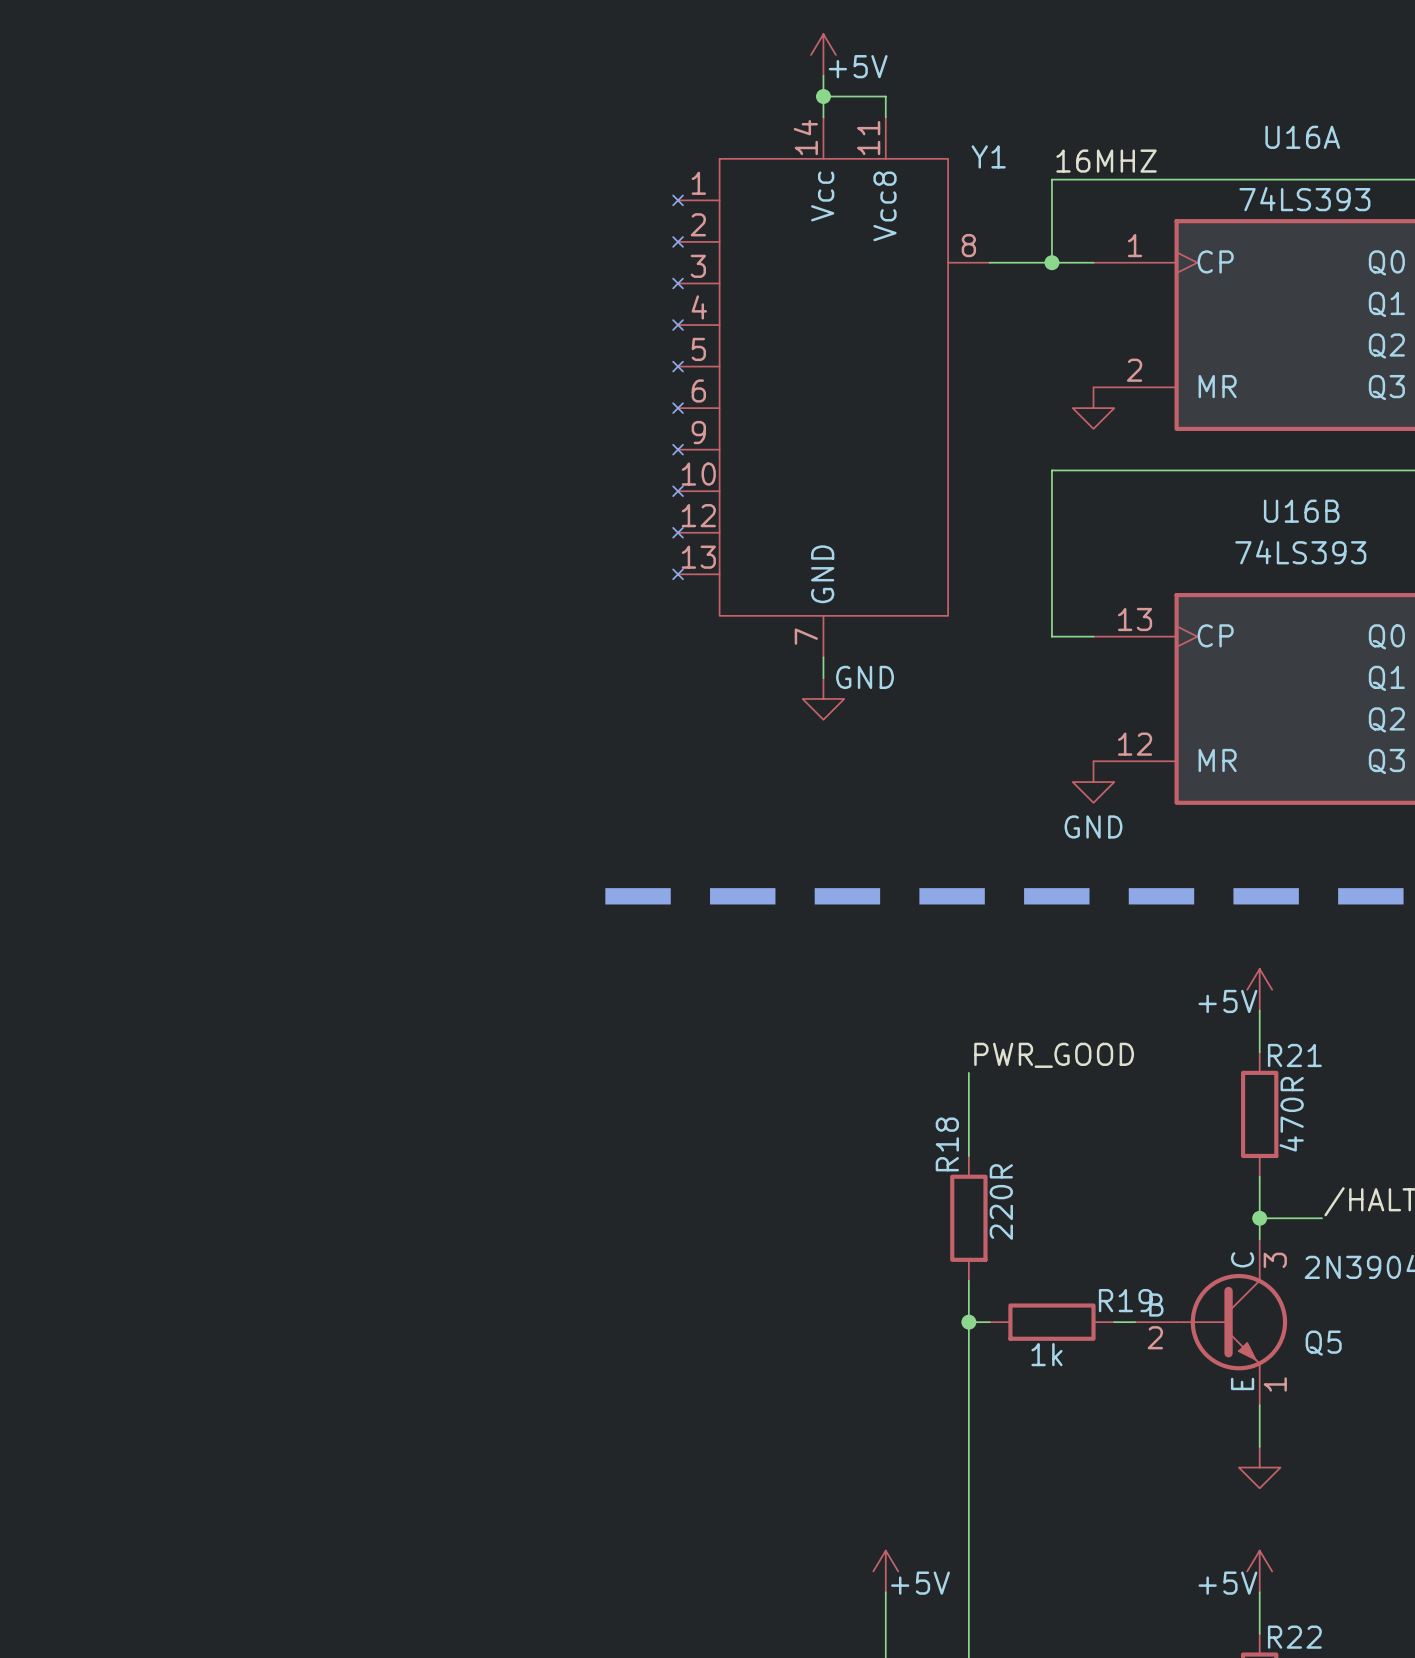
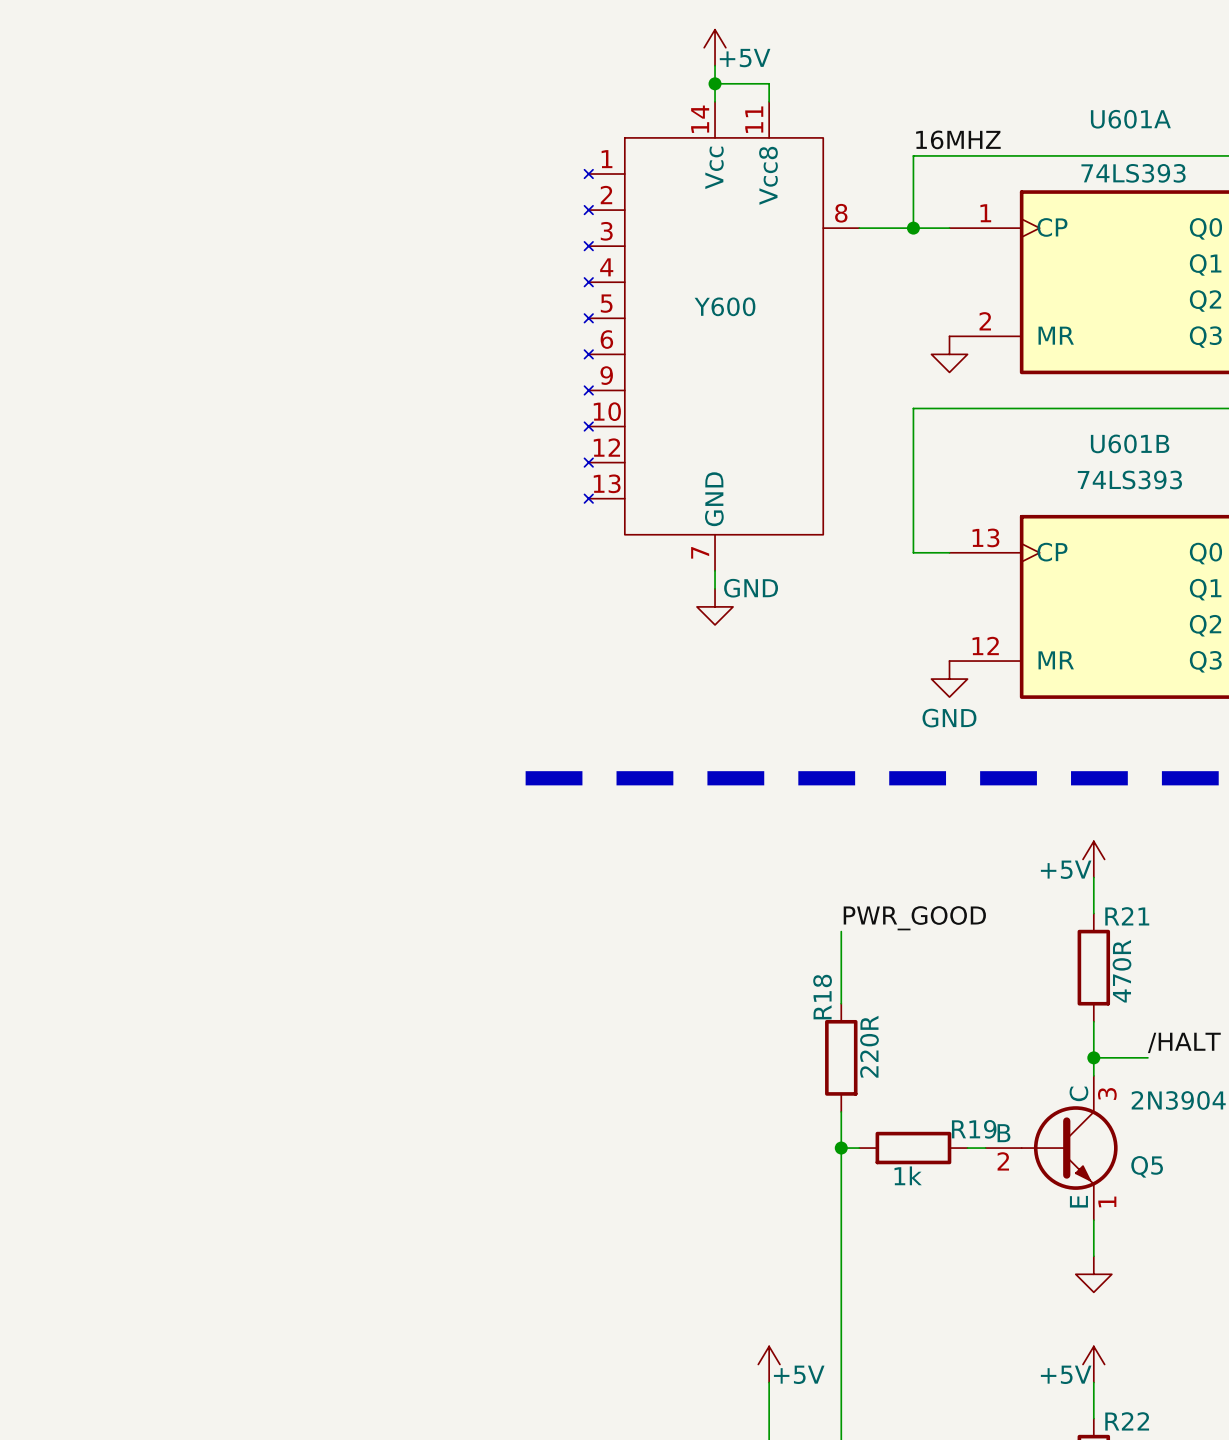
U16A name: U16A (1302, 137) -> U601A (1130, 119)
Y1 name: Y1 (988, 156) -> Y600 (724, 306)
U16B name: U16B (1301, 511) -> U601B (1130, 443)

